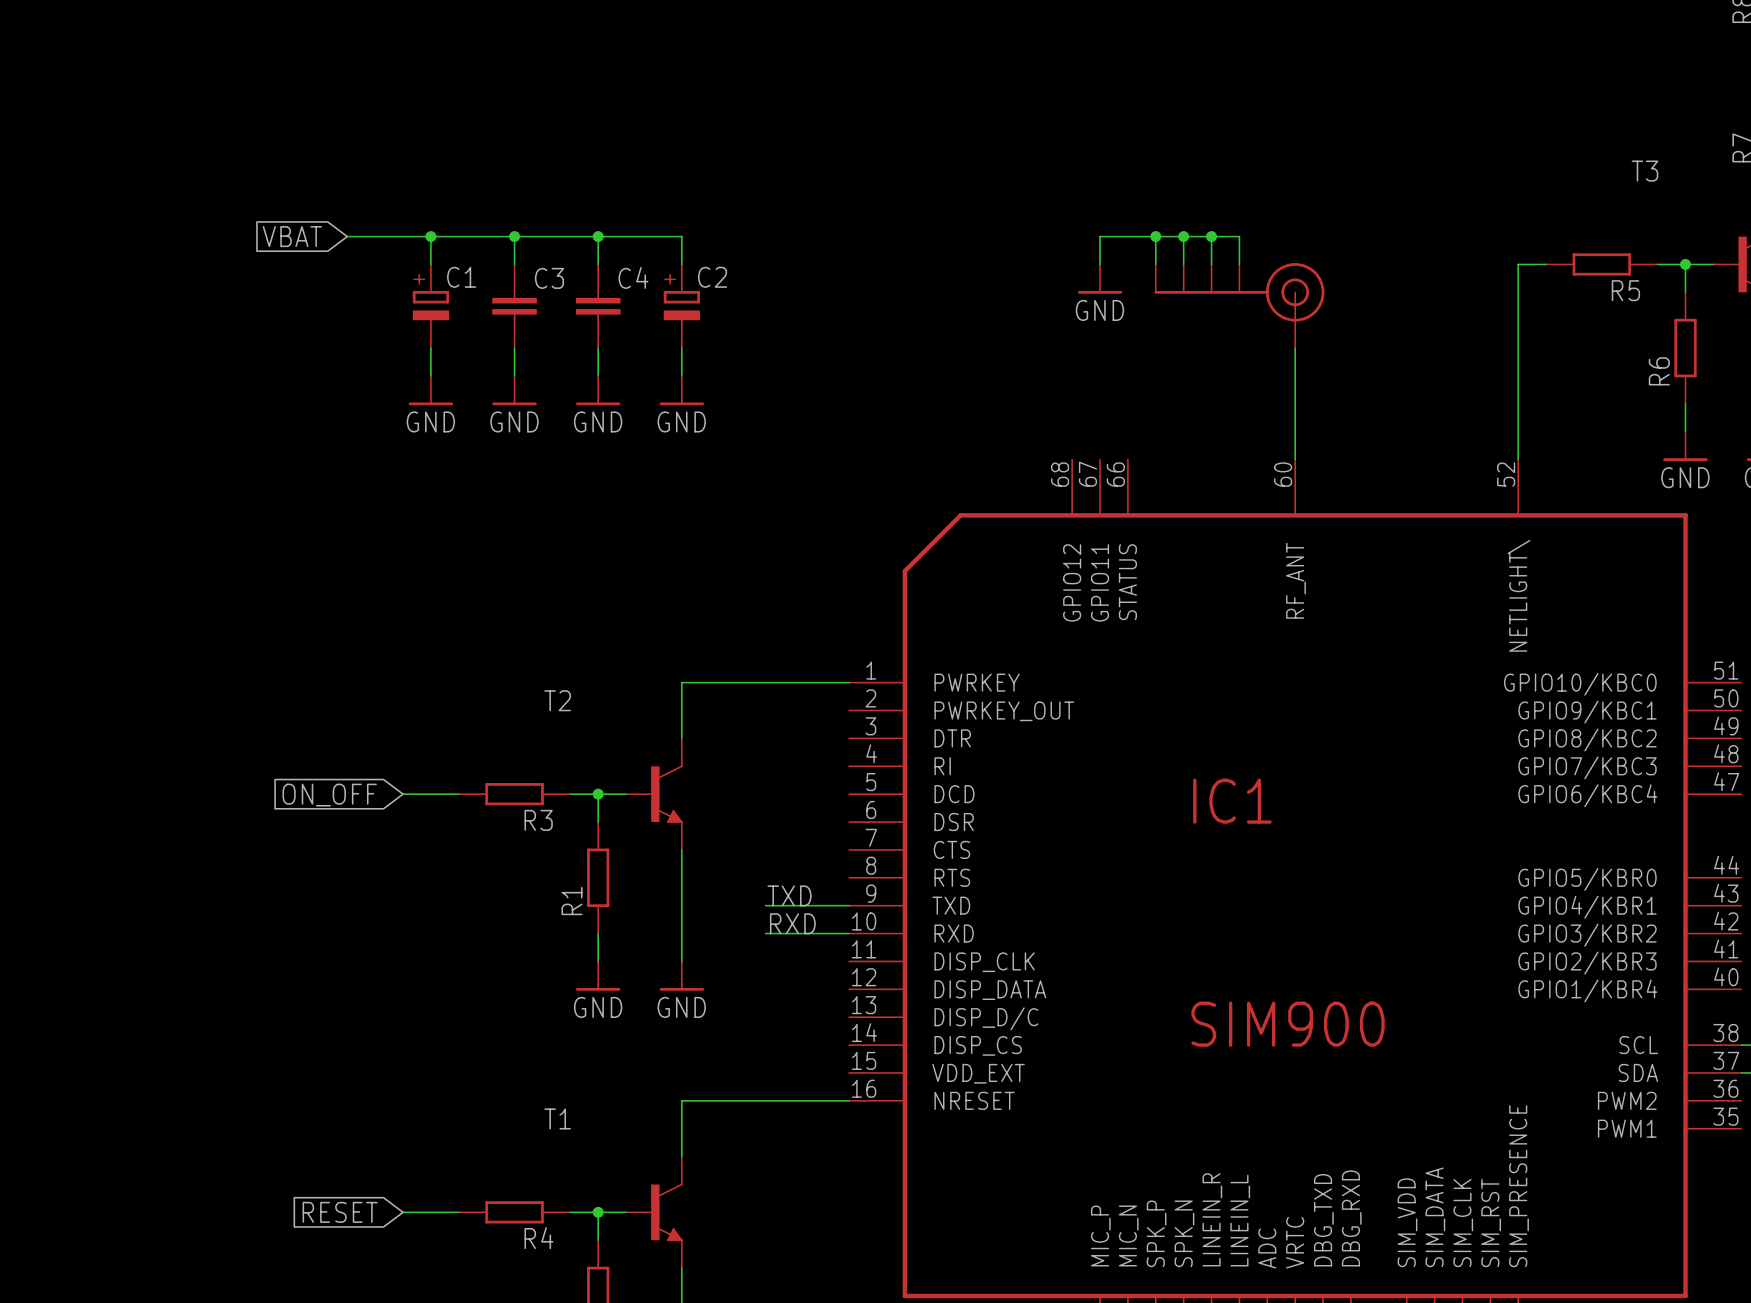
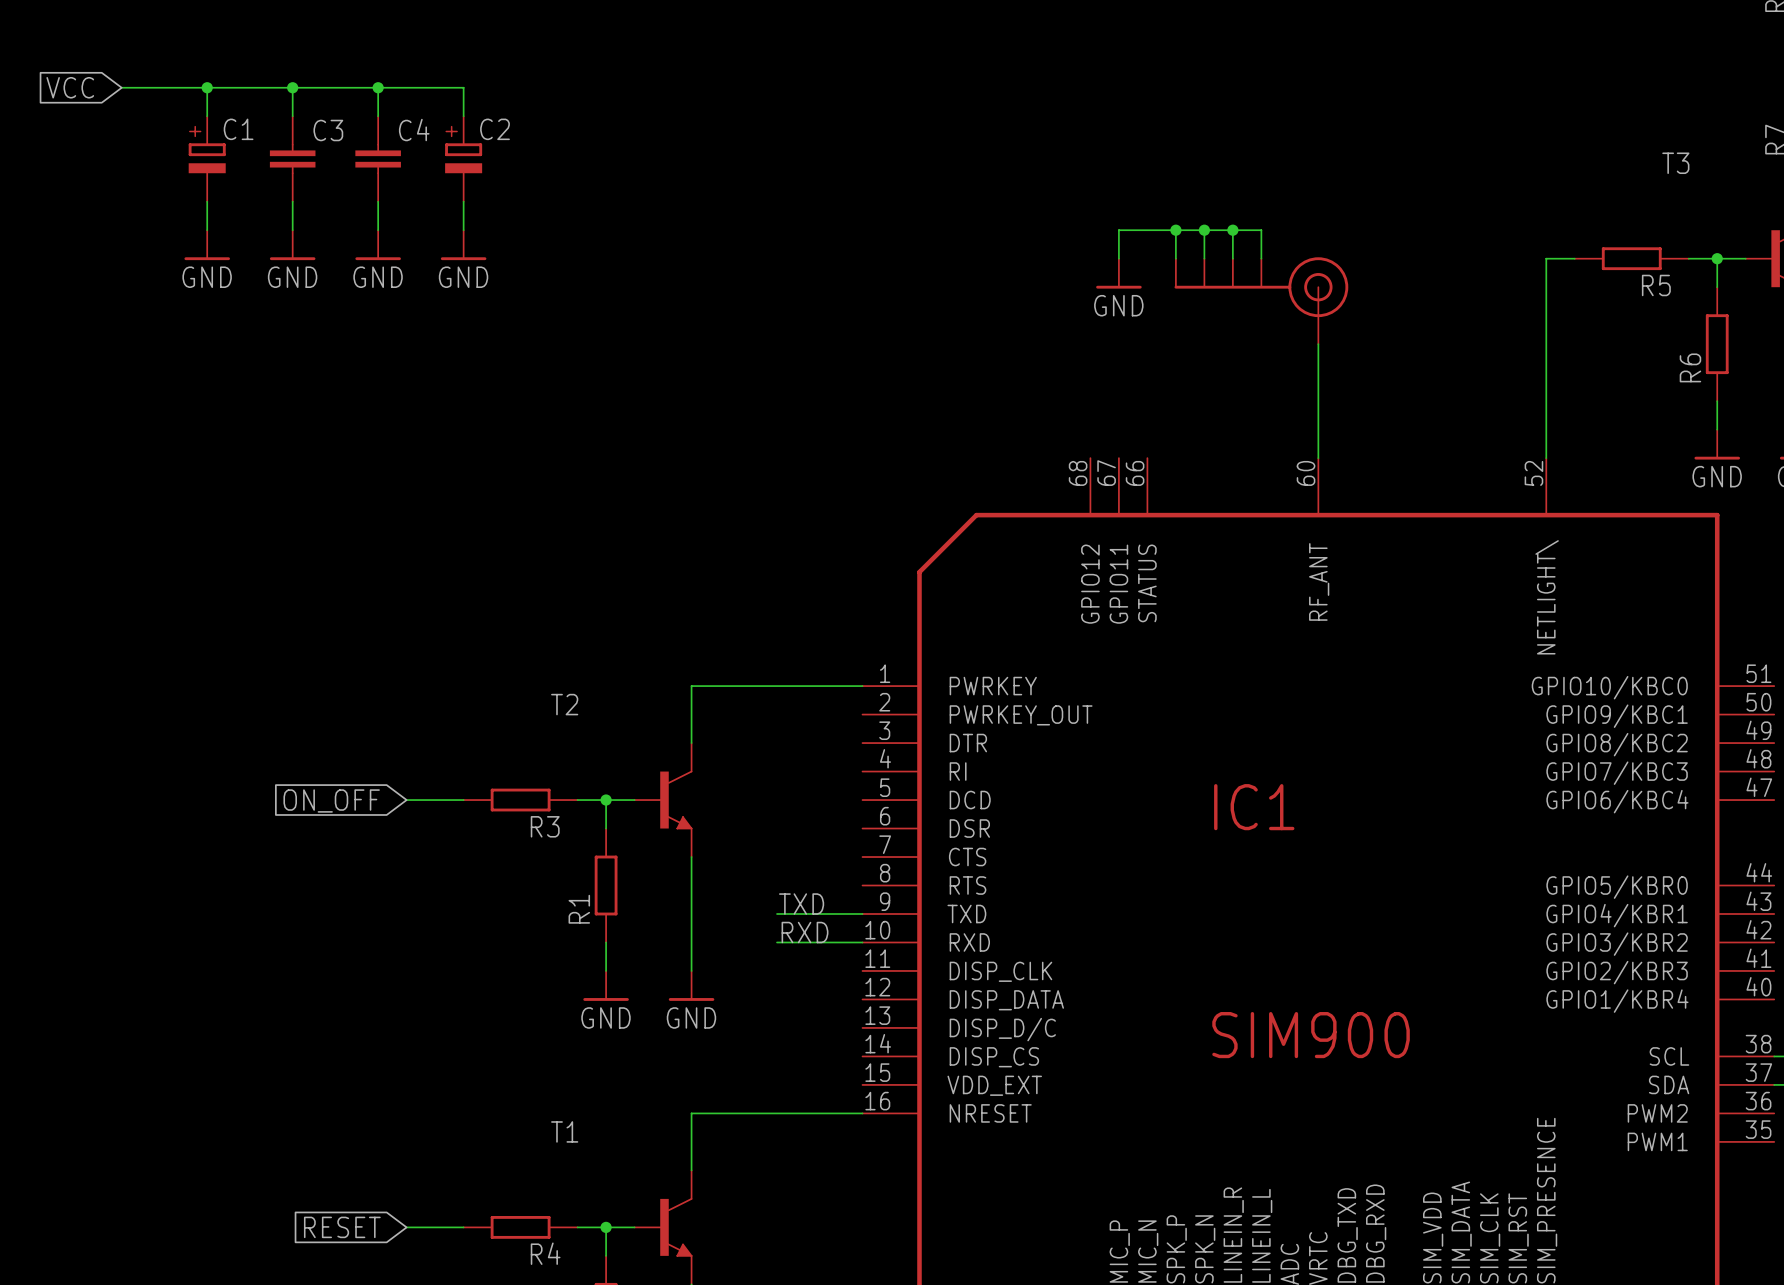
global label: none -> VCC (70, 87)
junction: none -> (207, 87)
junction: none -> (292, 87)
junction: none -> (378, 87)
global label: VBAT (292, 236) -> none
wire: (347, 236) (681, 236) (681, 264) -> (121, 87) (463, 87) (463, 116)
wire: (430, 236) (430, 264) -> (207, 87) (207, 116)
junction: (430, 236) -> none
wire: (514, 236) (514, 264) -> (292, 87) (292, 116)
junction: (514, 236) -> none
wire: (598, 236) (598, 264) -> (378, 87) (378, 116)
junction: (598, 236) -> none
power symbol: none -> GND (207, 245)
power symbol: none -> GND (292, 245)
power symbol: none -> GND (378, 245)
power symbol: none -> GND (463, 245)
C1 position: (430, 306) -> (207, 158)
C3 position: (514, 306) -> (292, 158)
C4 position: (598, 306) -> (378, 158)
C2 position: (681, 306) -> (463, 158)
wire: (430, 348) (430, 375) -> (207, 201) (207, 230)
wire: (514, 348) (514, 375) -> (292, 201) (292, 230)
wire: (598, 348) (598, 375) -> (378, 201) (378, 230)
wire: (681, 348) (681, 375) -> (463, 201) (463, 230)
power symbol: GND (430, 390) -> none
power symbol: GND (514, 390) -> none
power symbol: GND (598, 390) -> none
power symbol: GND (681, 390) -> none

